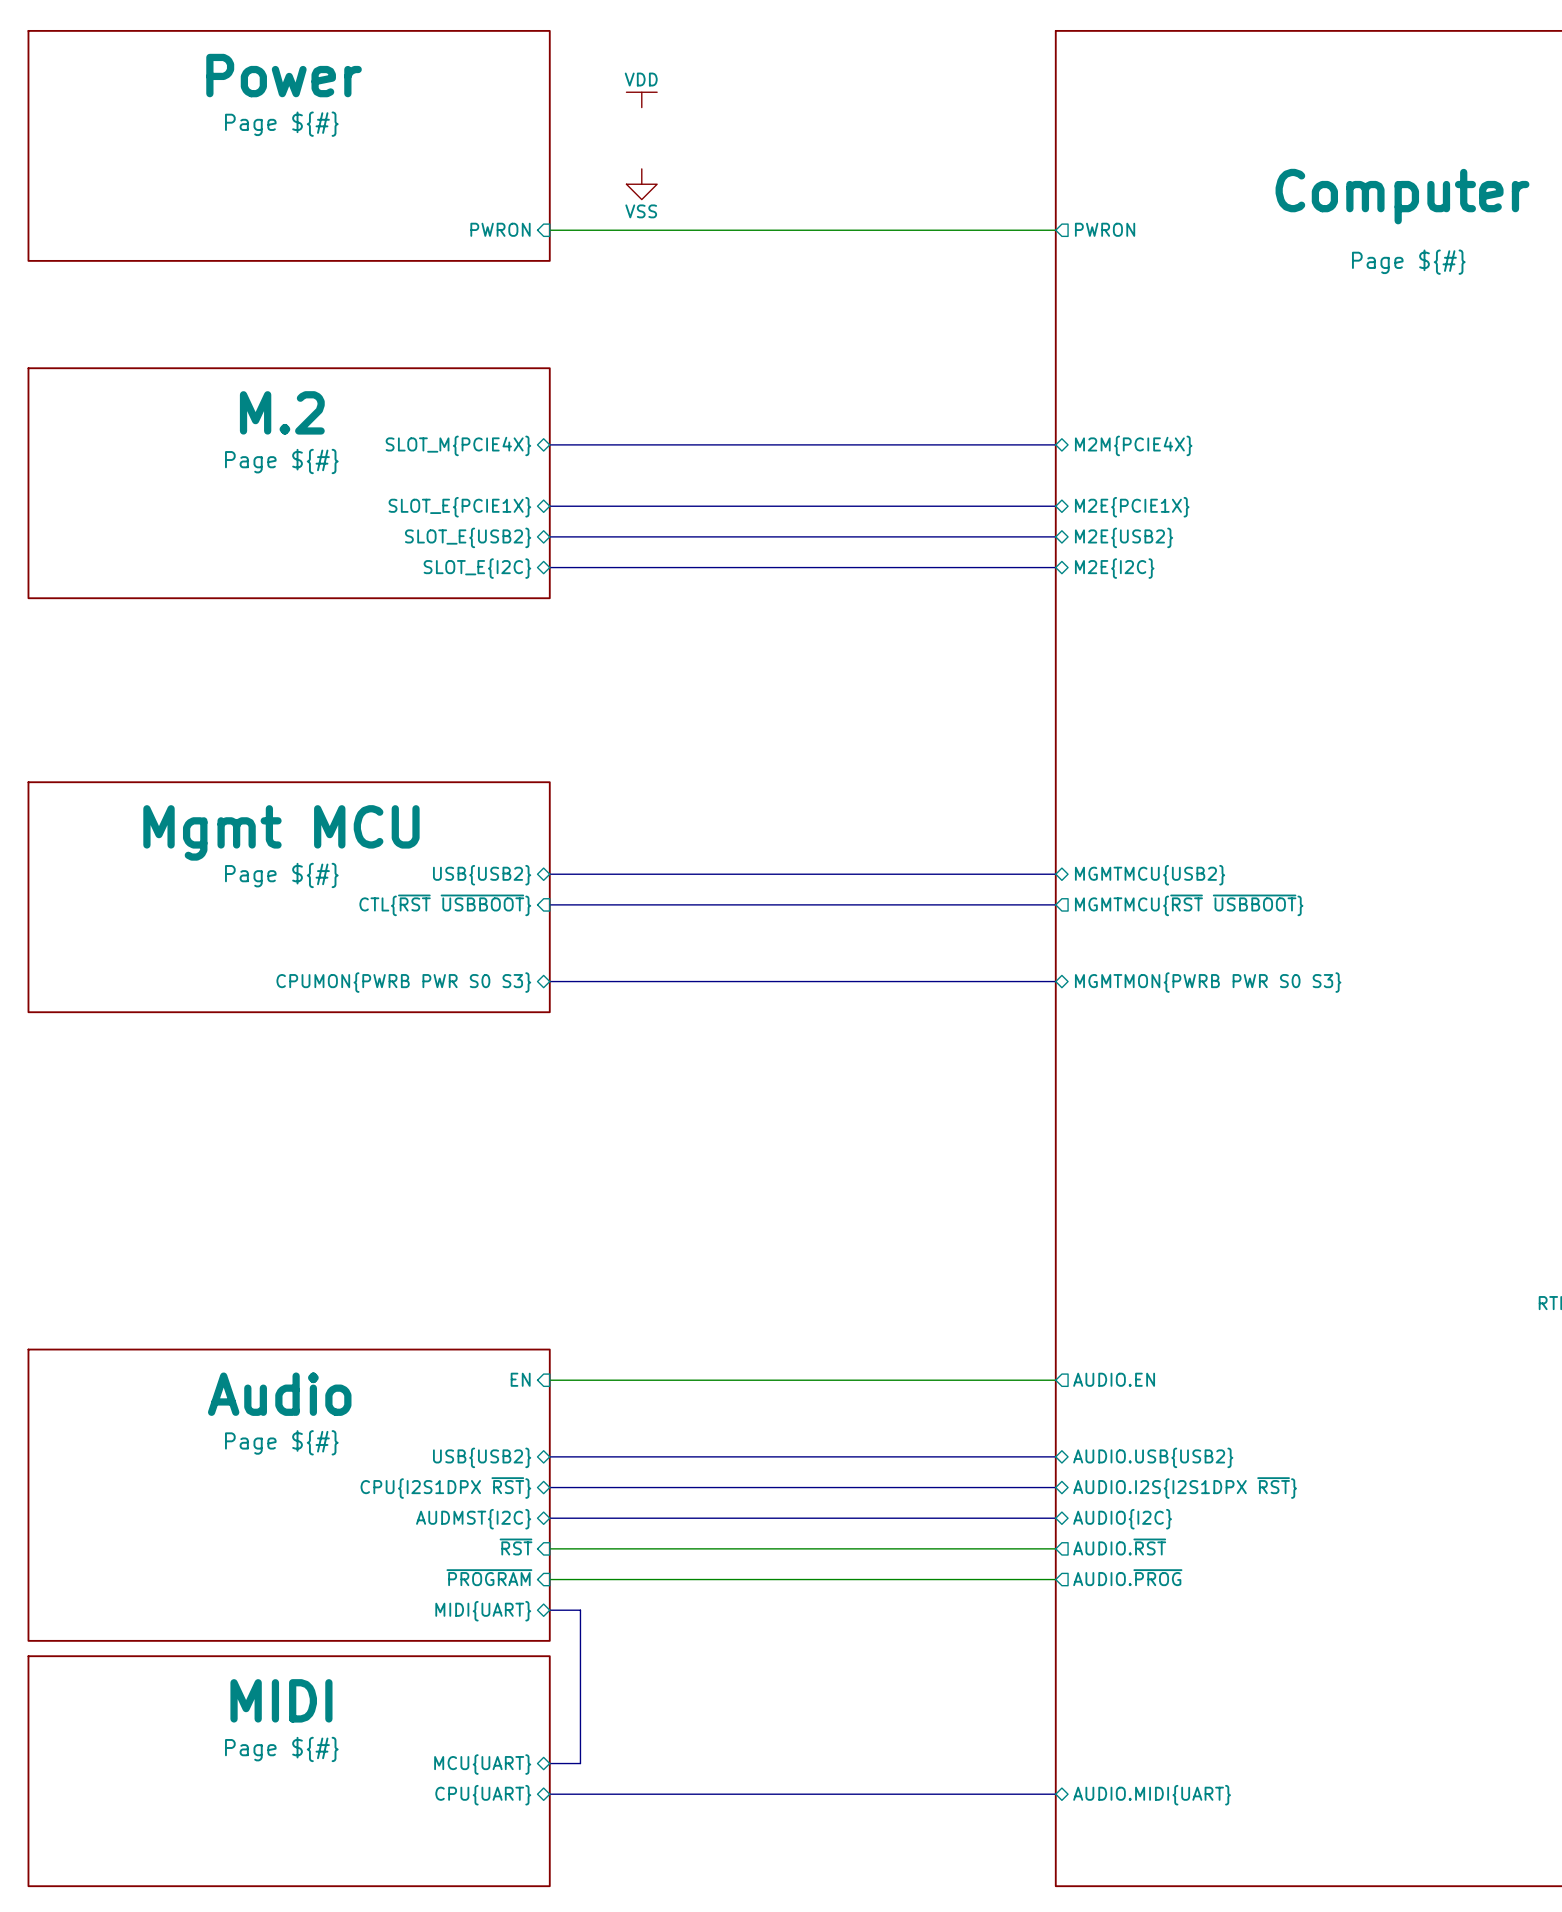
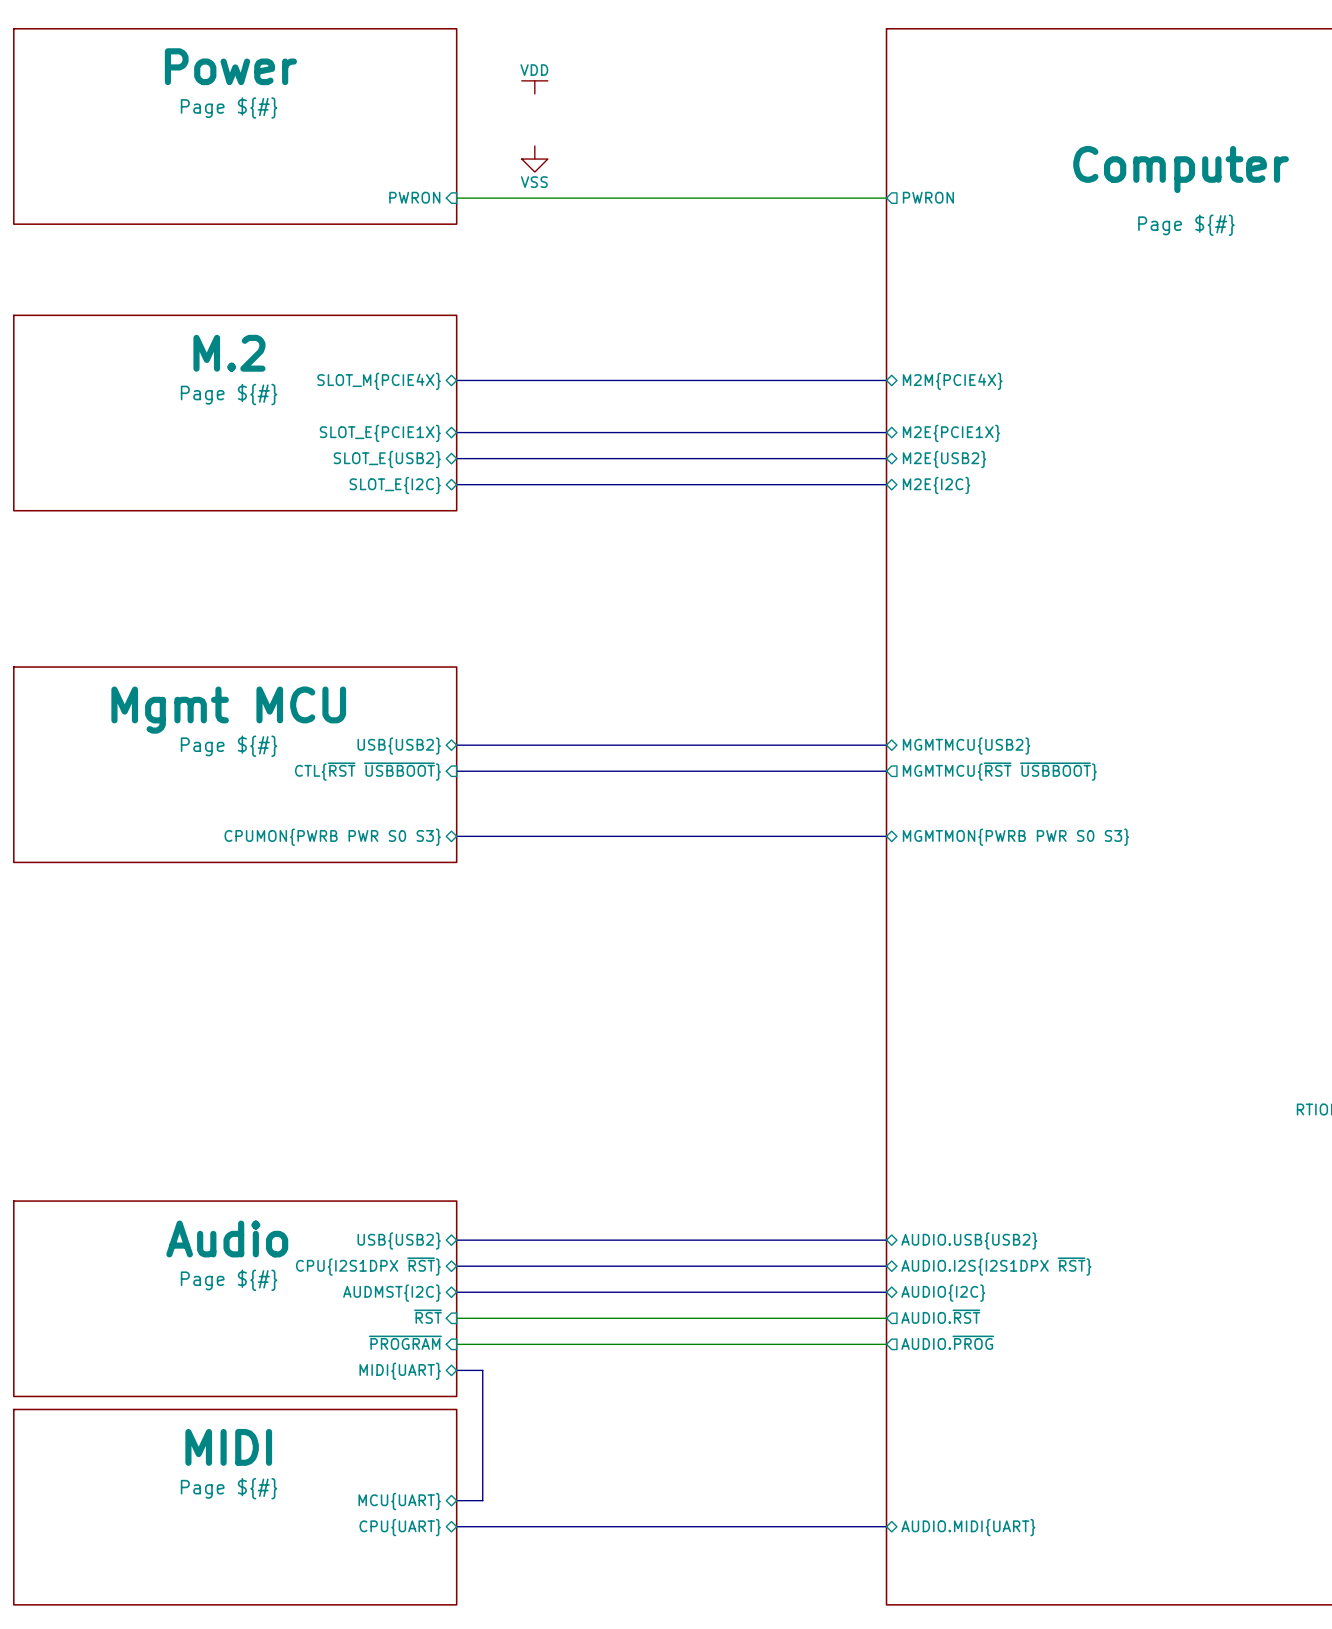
sheet pin: EN (520, 1379) -> none
sheet pin: AUDIO.EN (1114, 1379) -> none
wire: (549, 1380) (1055, 1380) -> none
sheet Audio: (289, 1495) -> none
sheet Audio: none -> (235, 1298)

